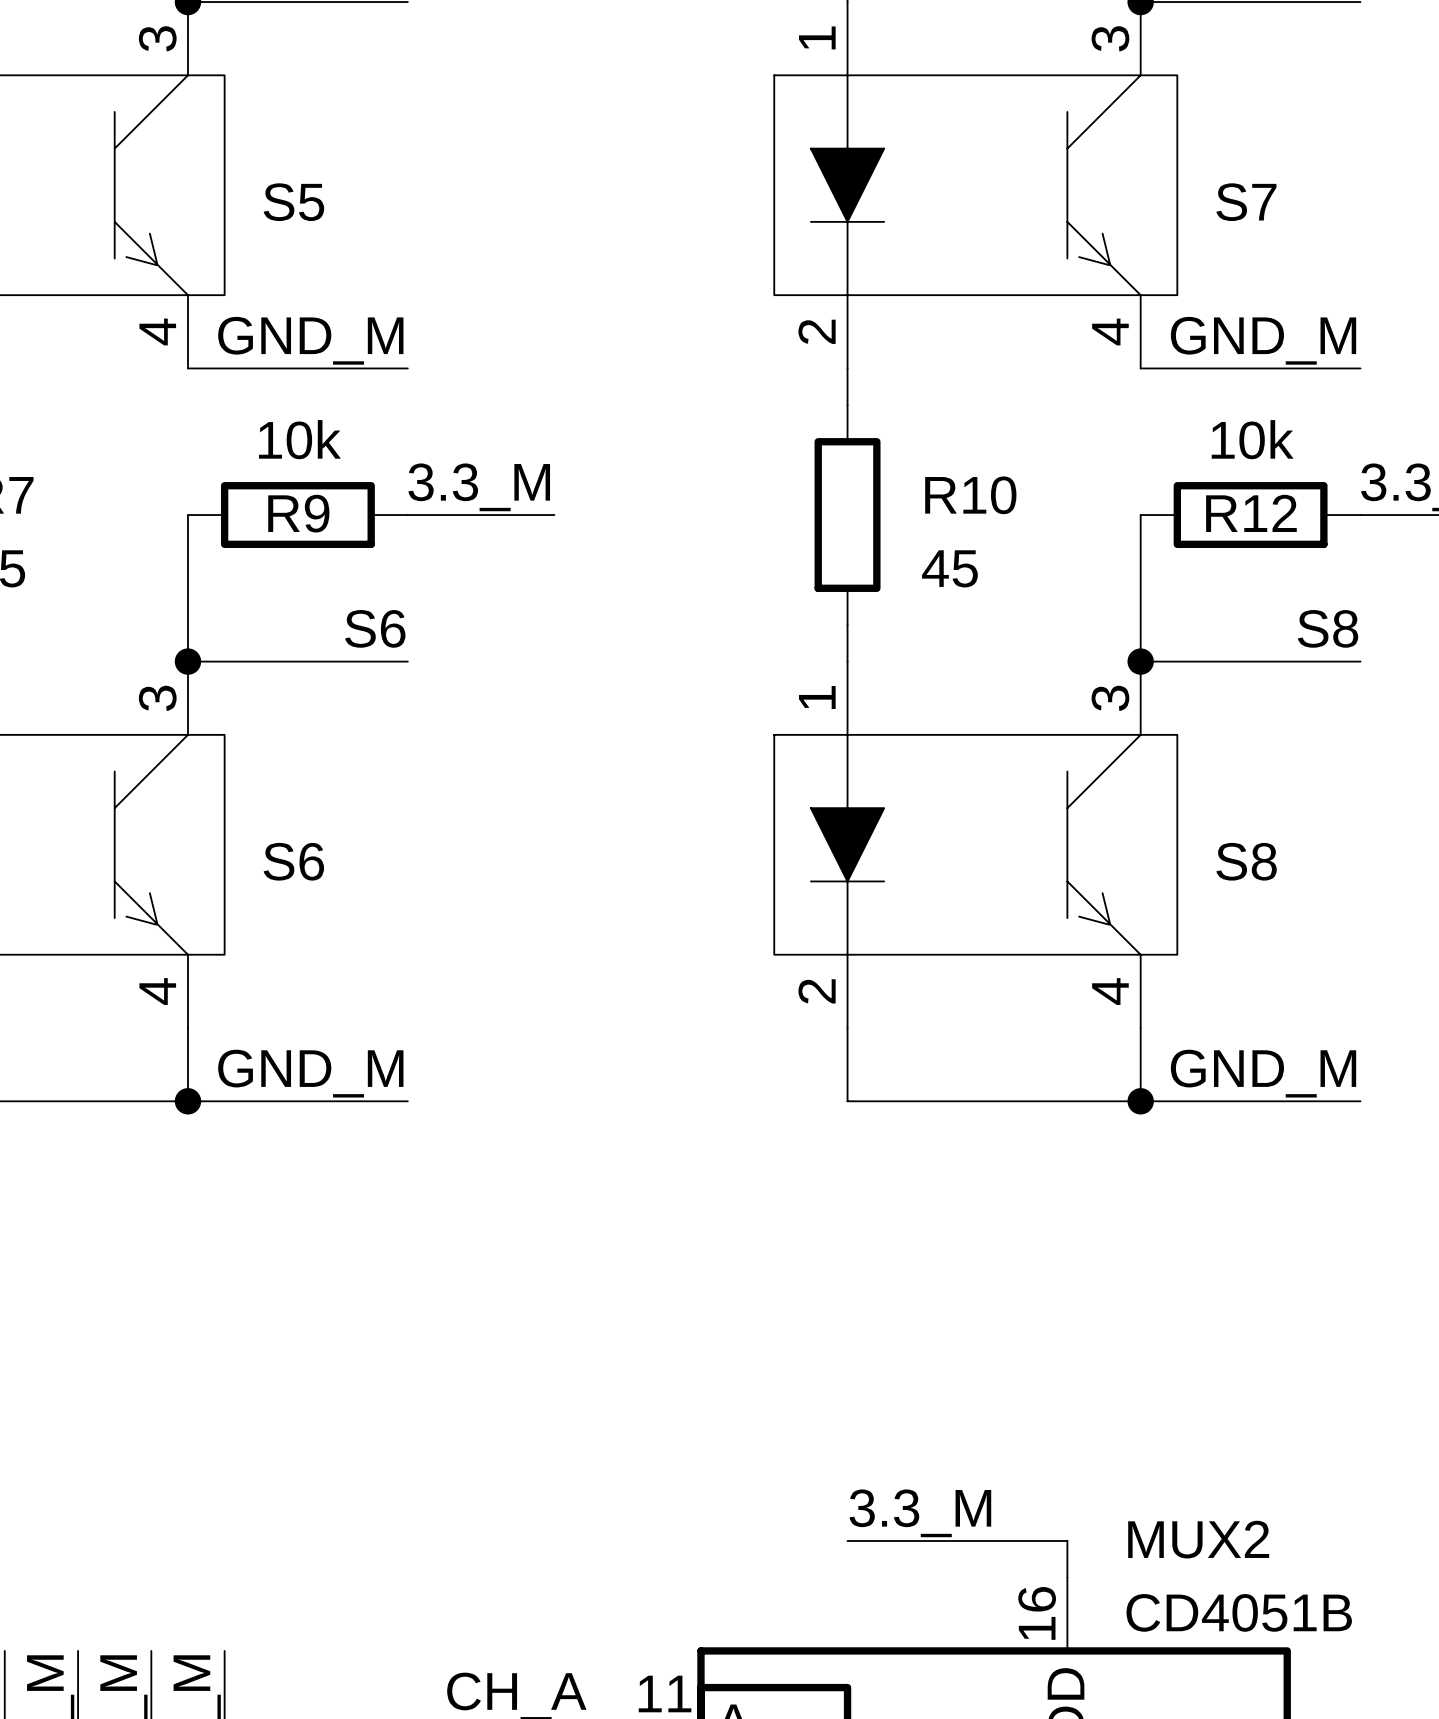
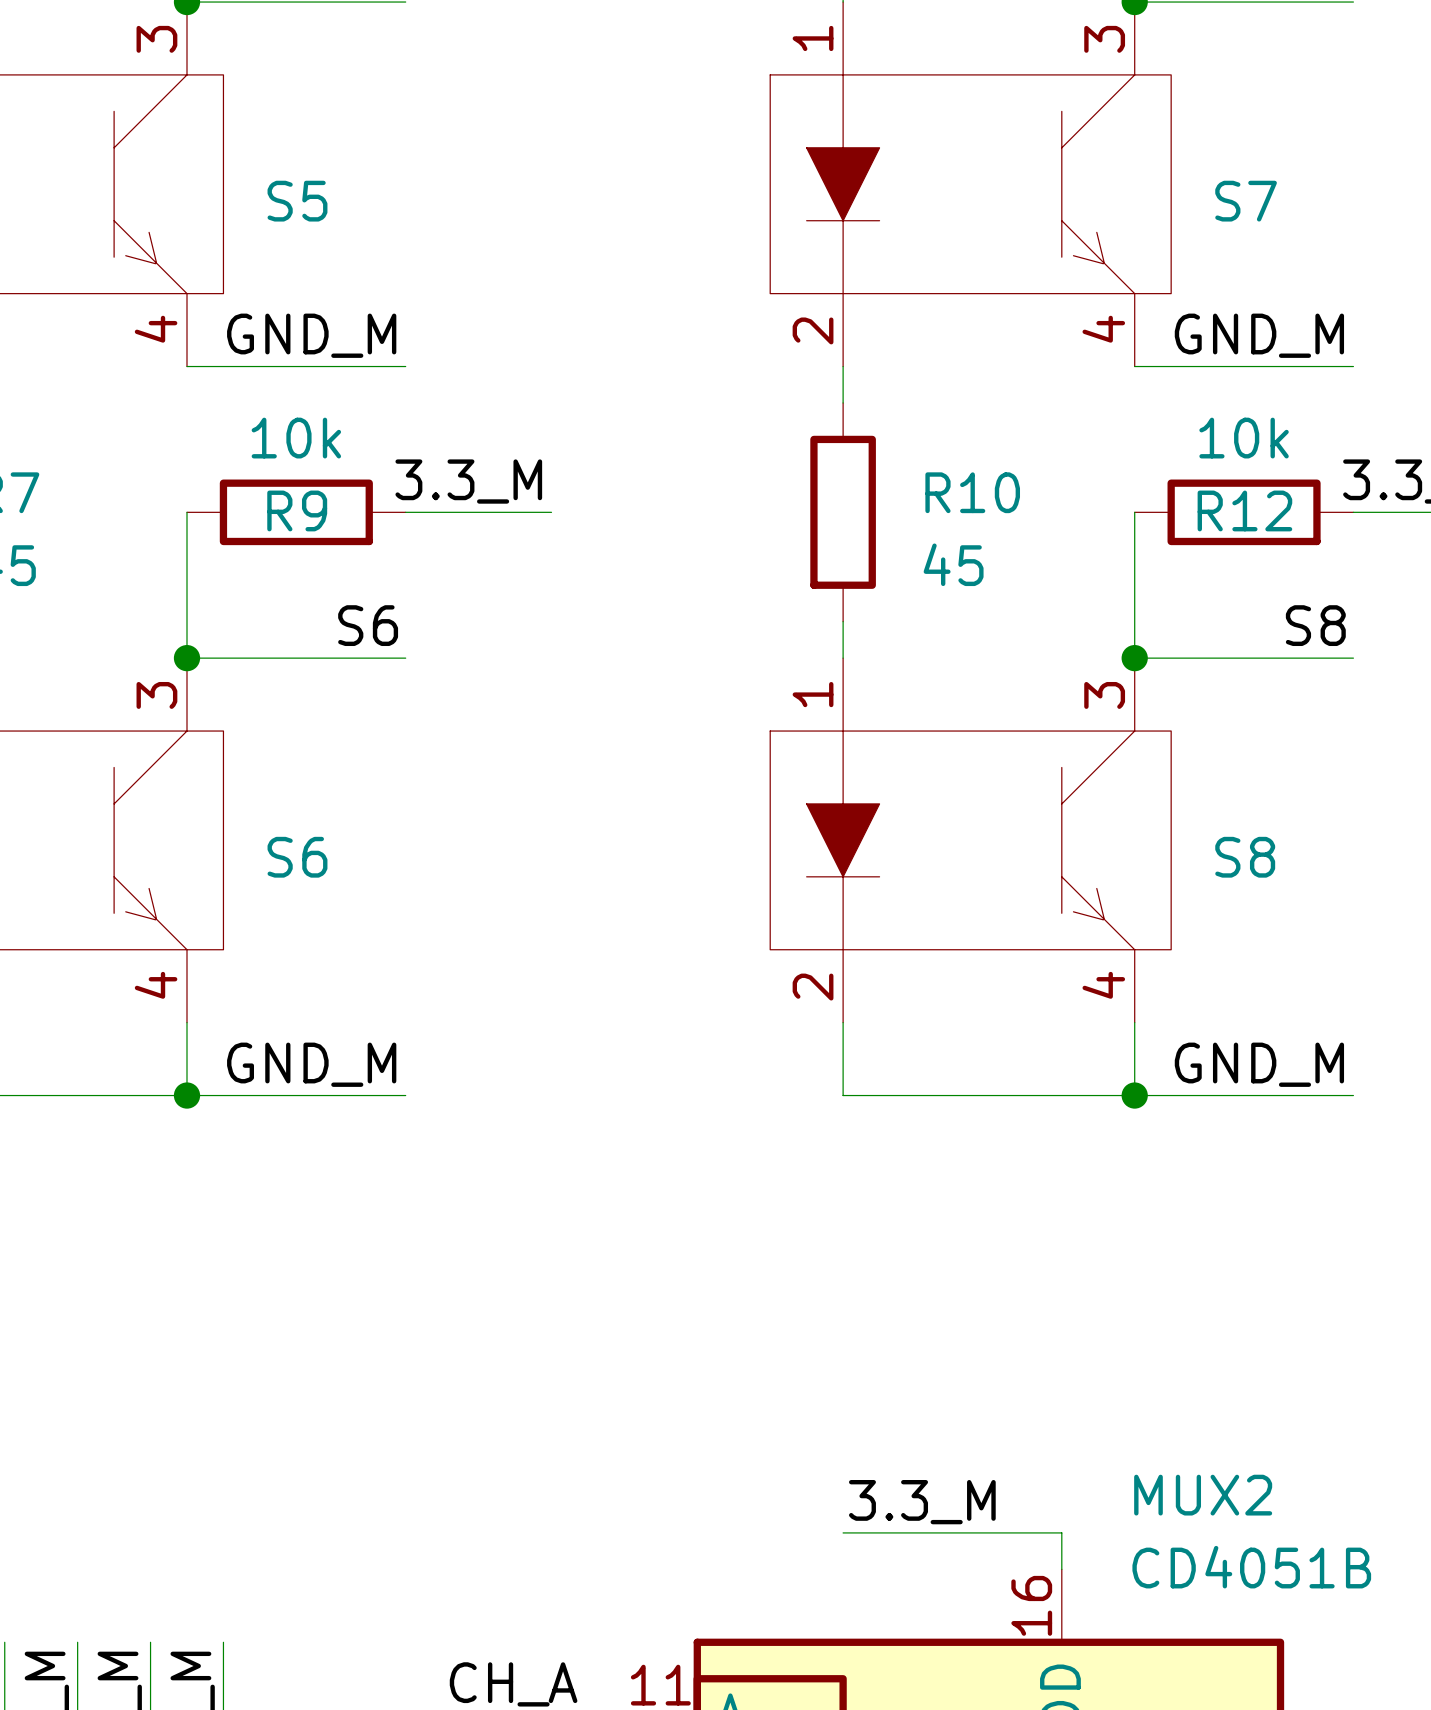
MUX2 name position: MUX2 (1198, 1539) -> MUX2 (1203, 1495)
MUX2 value position: CD4051B (1239, 1612) -> CD4051B (1251, 1567)

